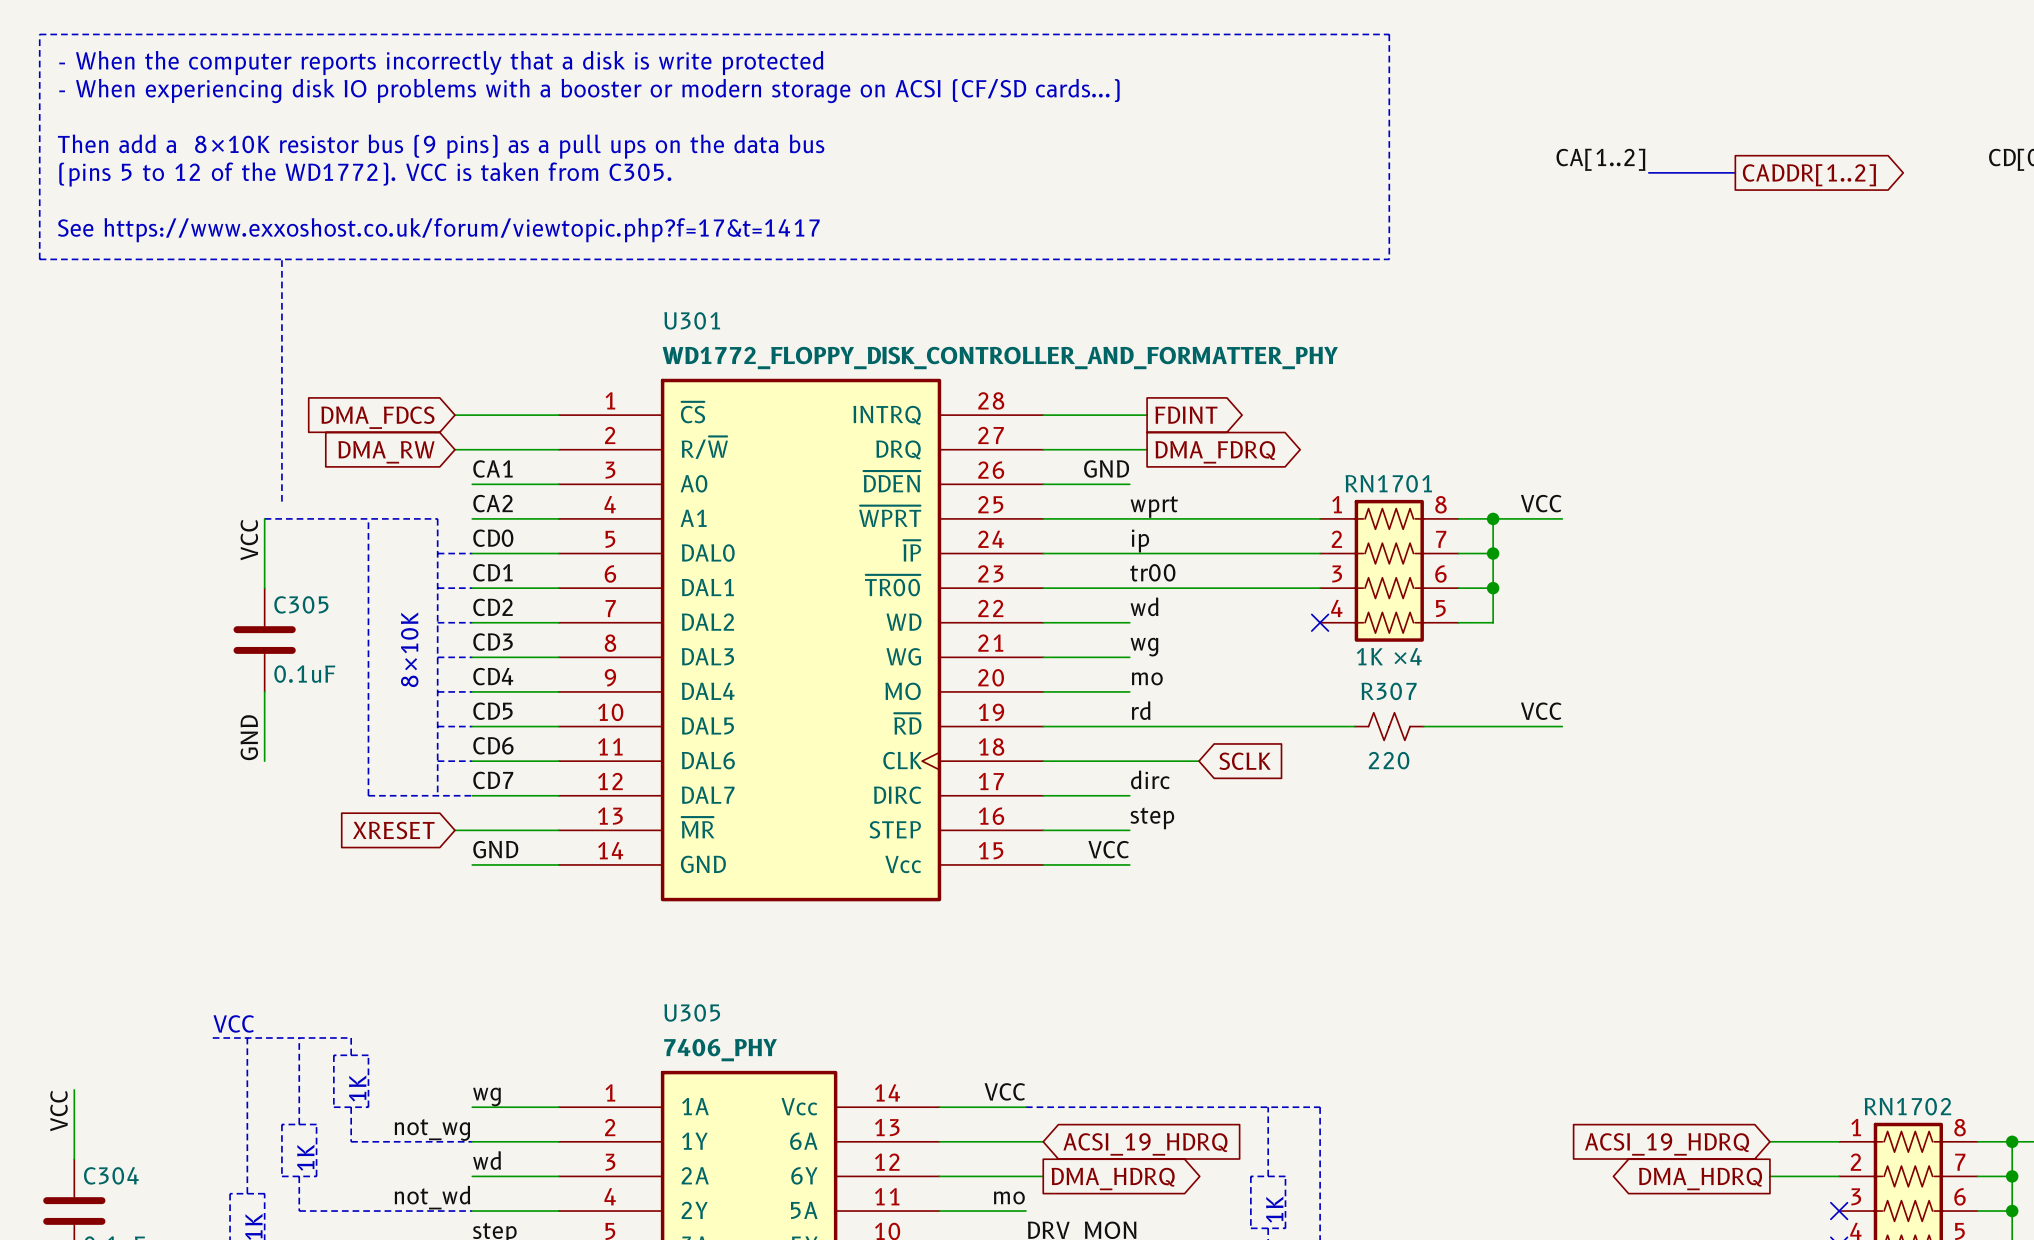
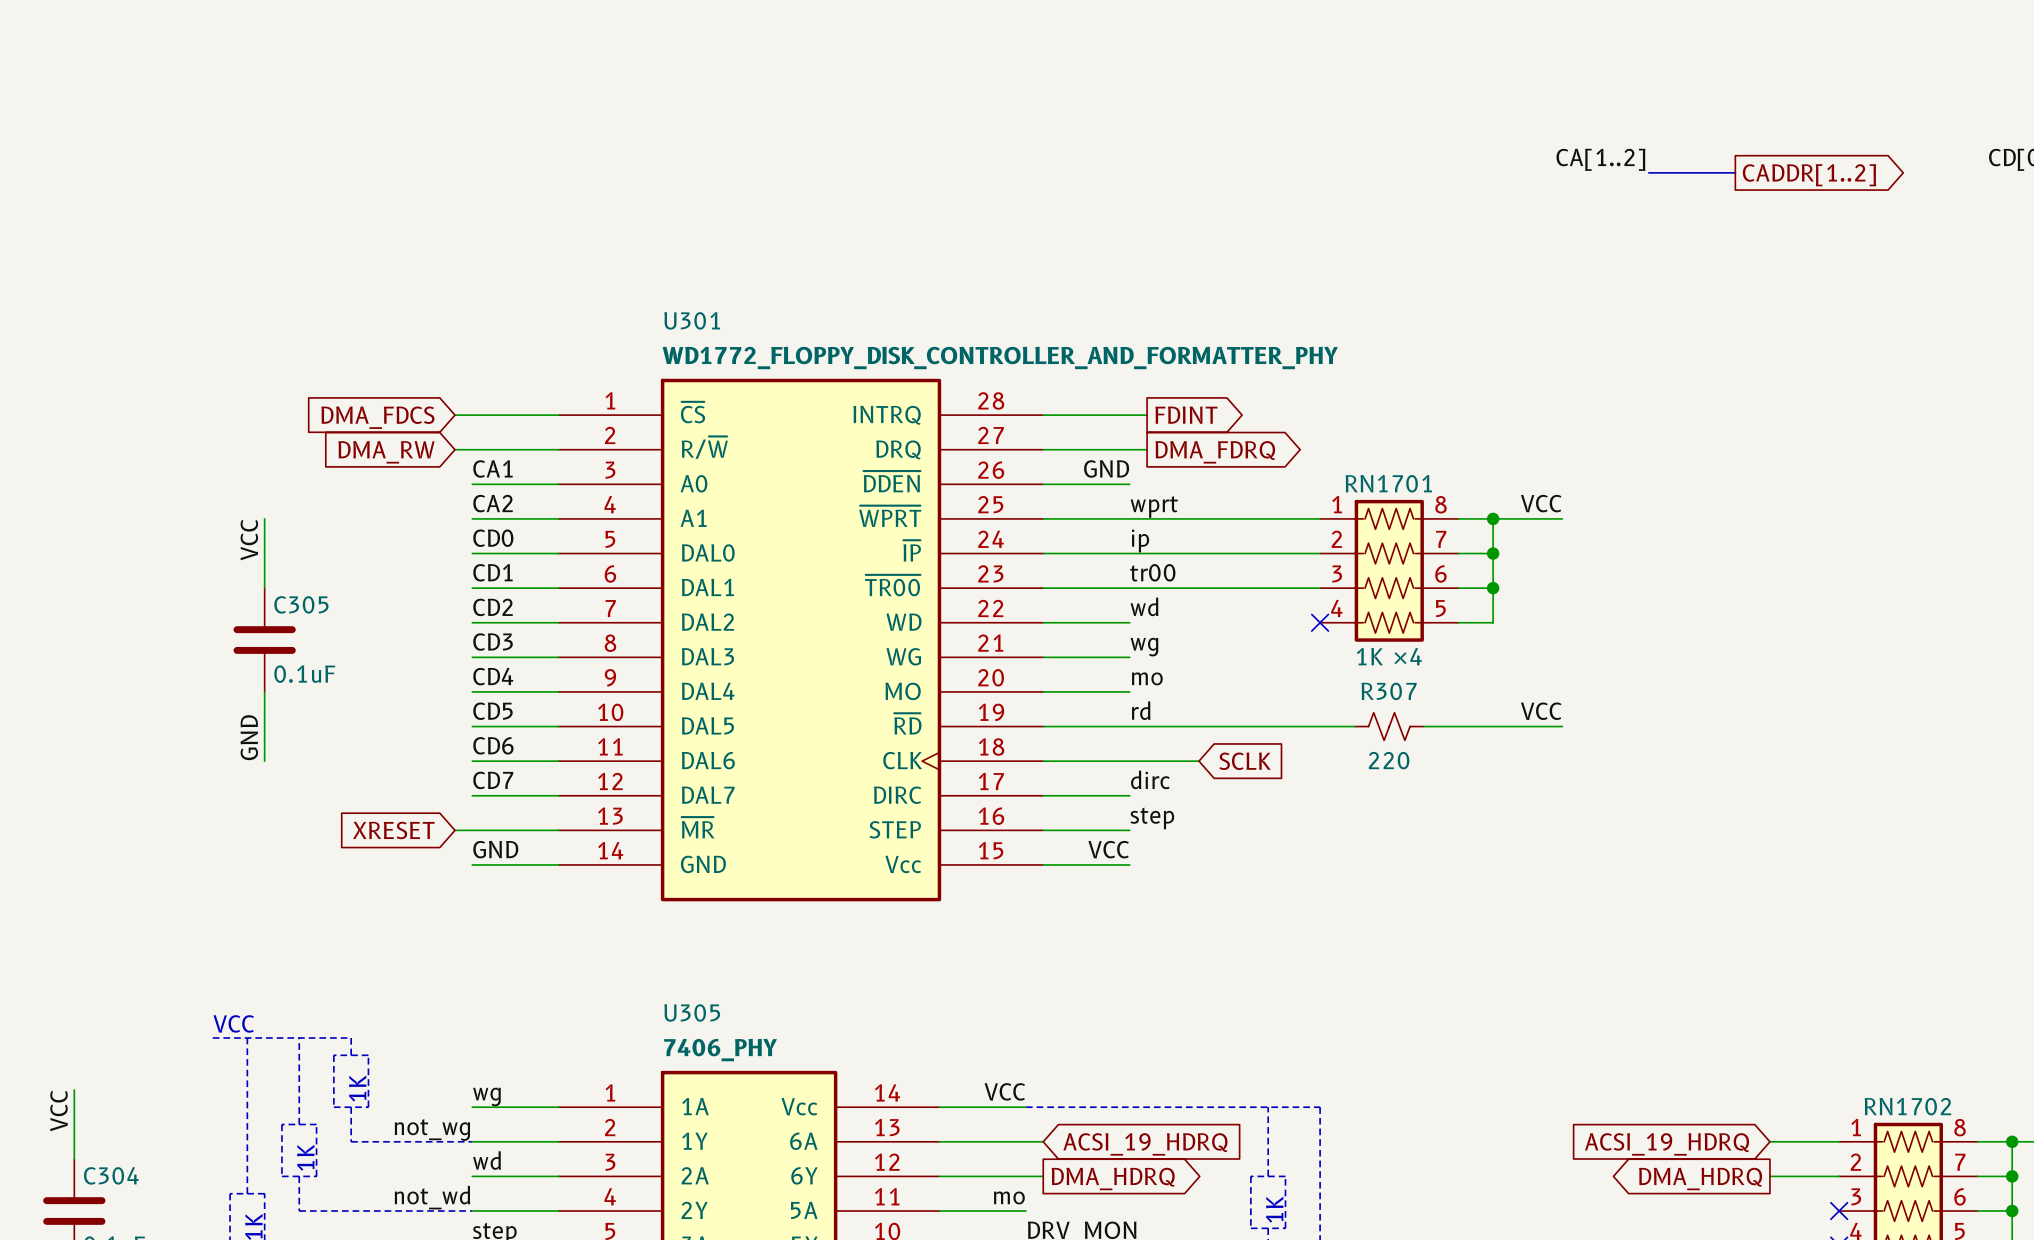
line: (39, 34) (39, 259) (1389, 259) (1389, 34) (39, 34) -> none
text: - When the computer reports incorrectly that a disk is write protected (441, 63) -> none
text: - When experiencing disk IO problems with a booster or modern storage on ACSI (CF/SD cards...) (589, 91) -> none
text: Then add a 8×10K resistor bus (9 pins) as a pull ups on the data bus (441, 146) -> none
text: (pins 5 to 12 of the WD1772). VCC is taken from C305. (365, 174) -> none
text: See https://www.exxoshost.co.uk/forum/viewtopic.php?f=17&t=1417 (438, 230) -> none
line: (281, 259) (281, 501) -> none
line: (264, 518) (437, 518) (437, 795) -> none
line: (368, 518) (368, 795) (472, 795) -> none
line: (437, 553) (472, 553) -> none
line: (437, 588) (472, 588) -> none
line: (437, 622) (472, 622) -> none
text: 8×10K (409, 649) -> none
line: (437, 657) (472, 657) -> none
line: (437, 691) (472, 691) -> none
line: (437, 726) (472, 726) -> none
line: (437, 761) (472, 761) -> none

